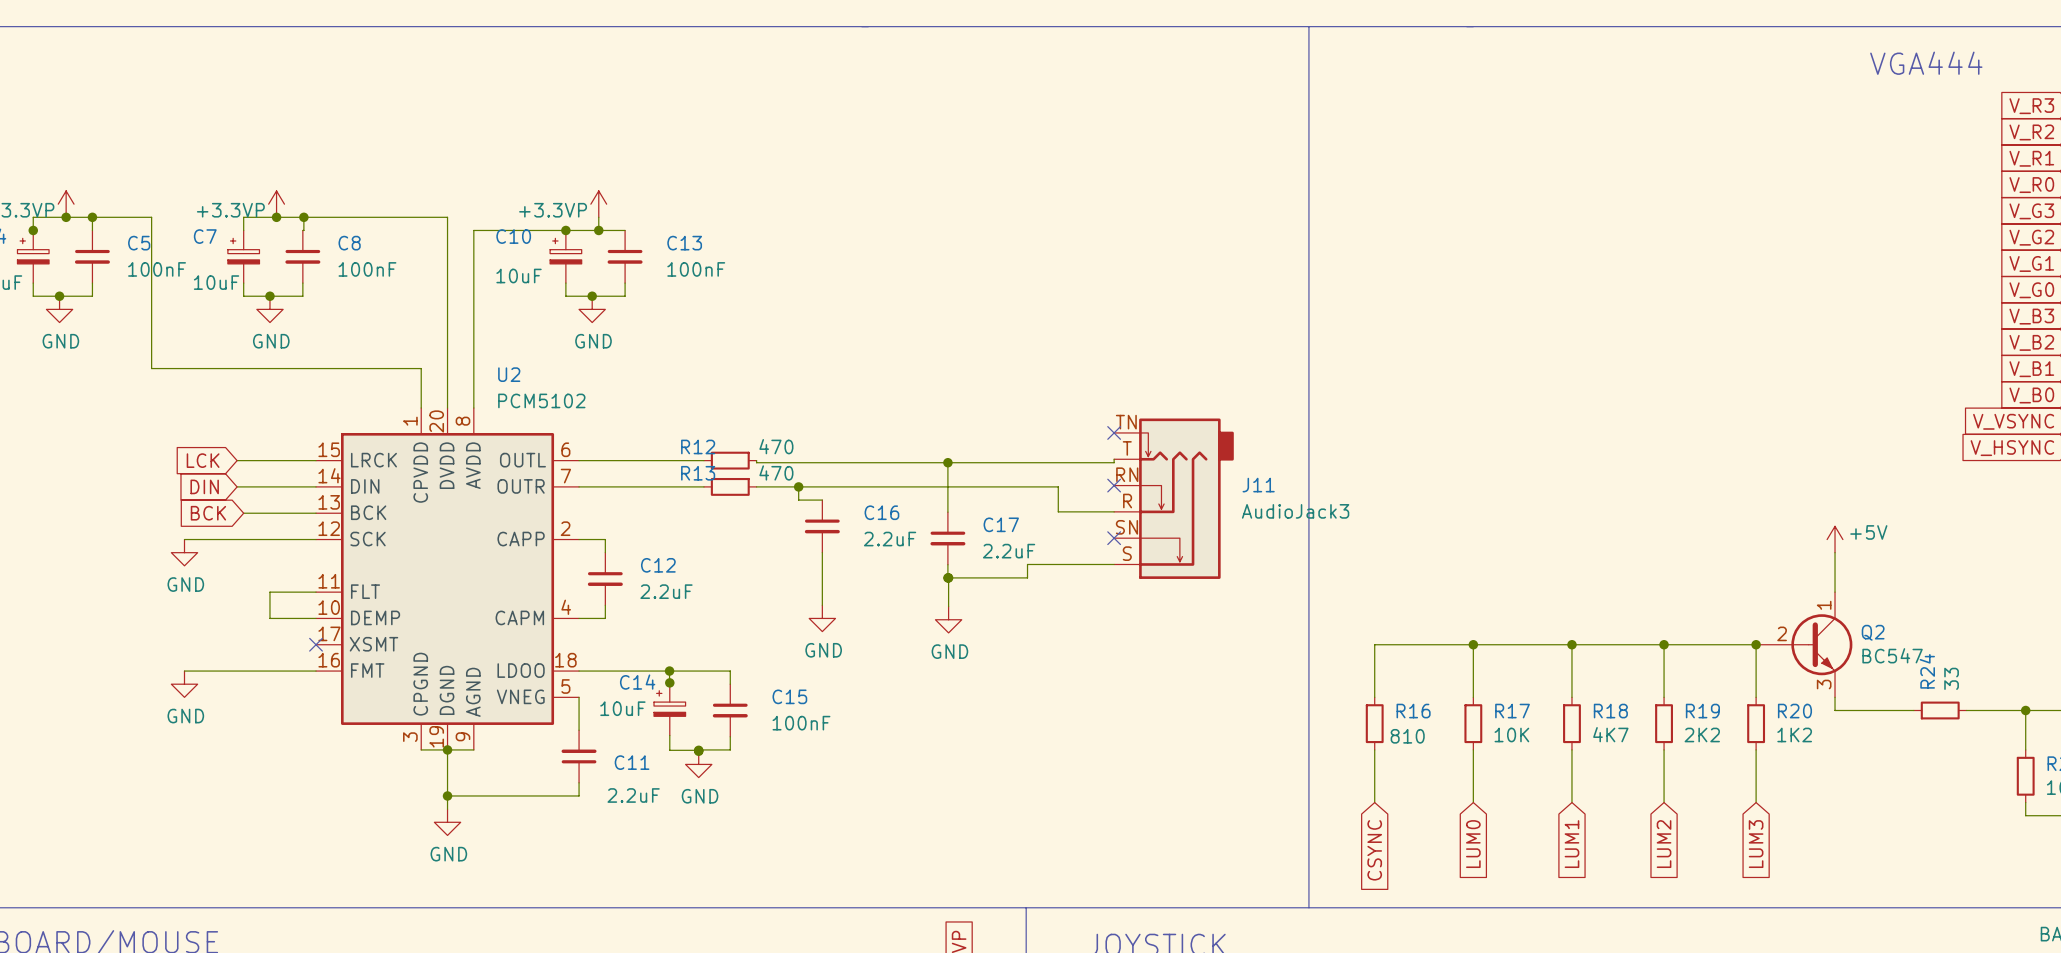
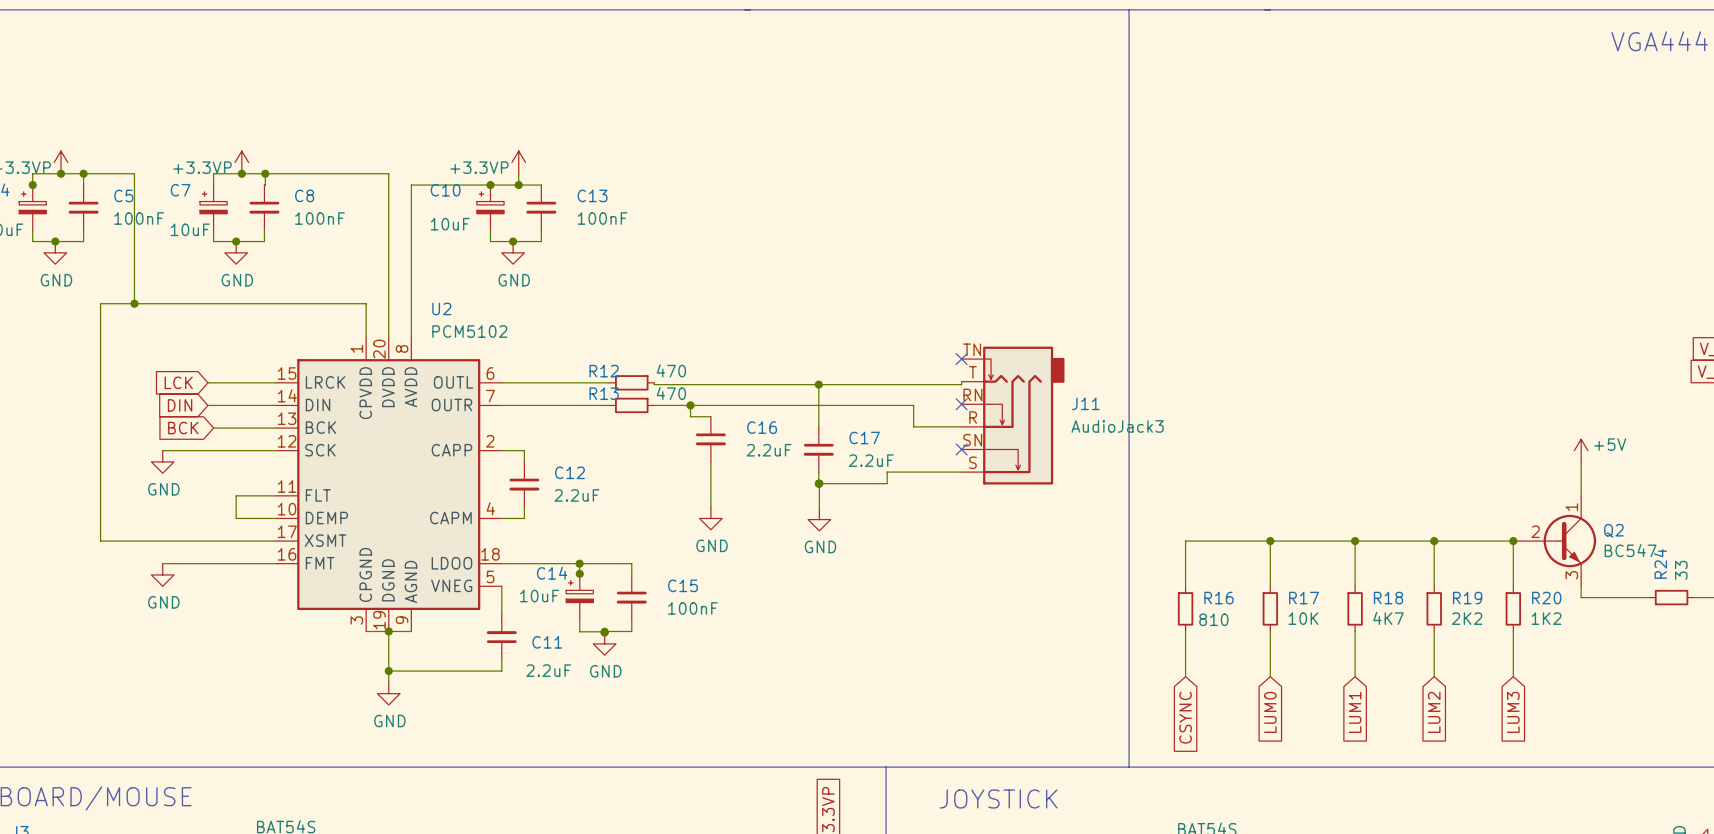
wire: none -> (134, 303) (100, 303) (100, 541) (275, 541)
junction: none -> (134, 303)
no-connect mark: (316, 644) -> none

